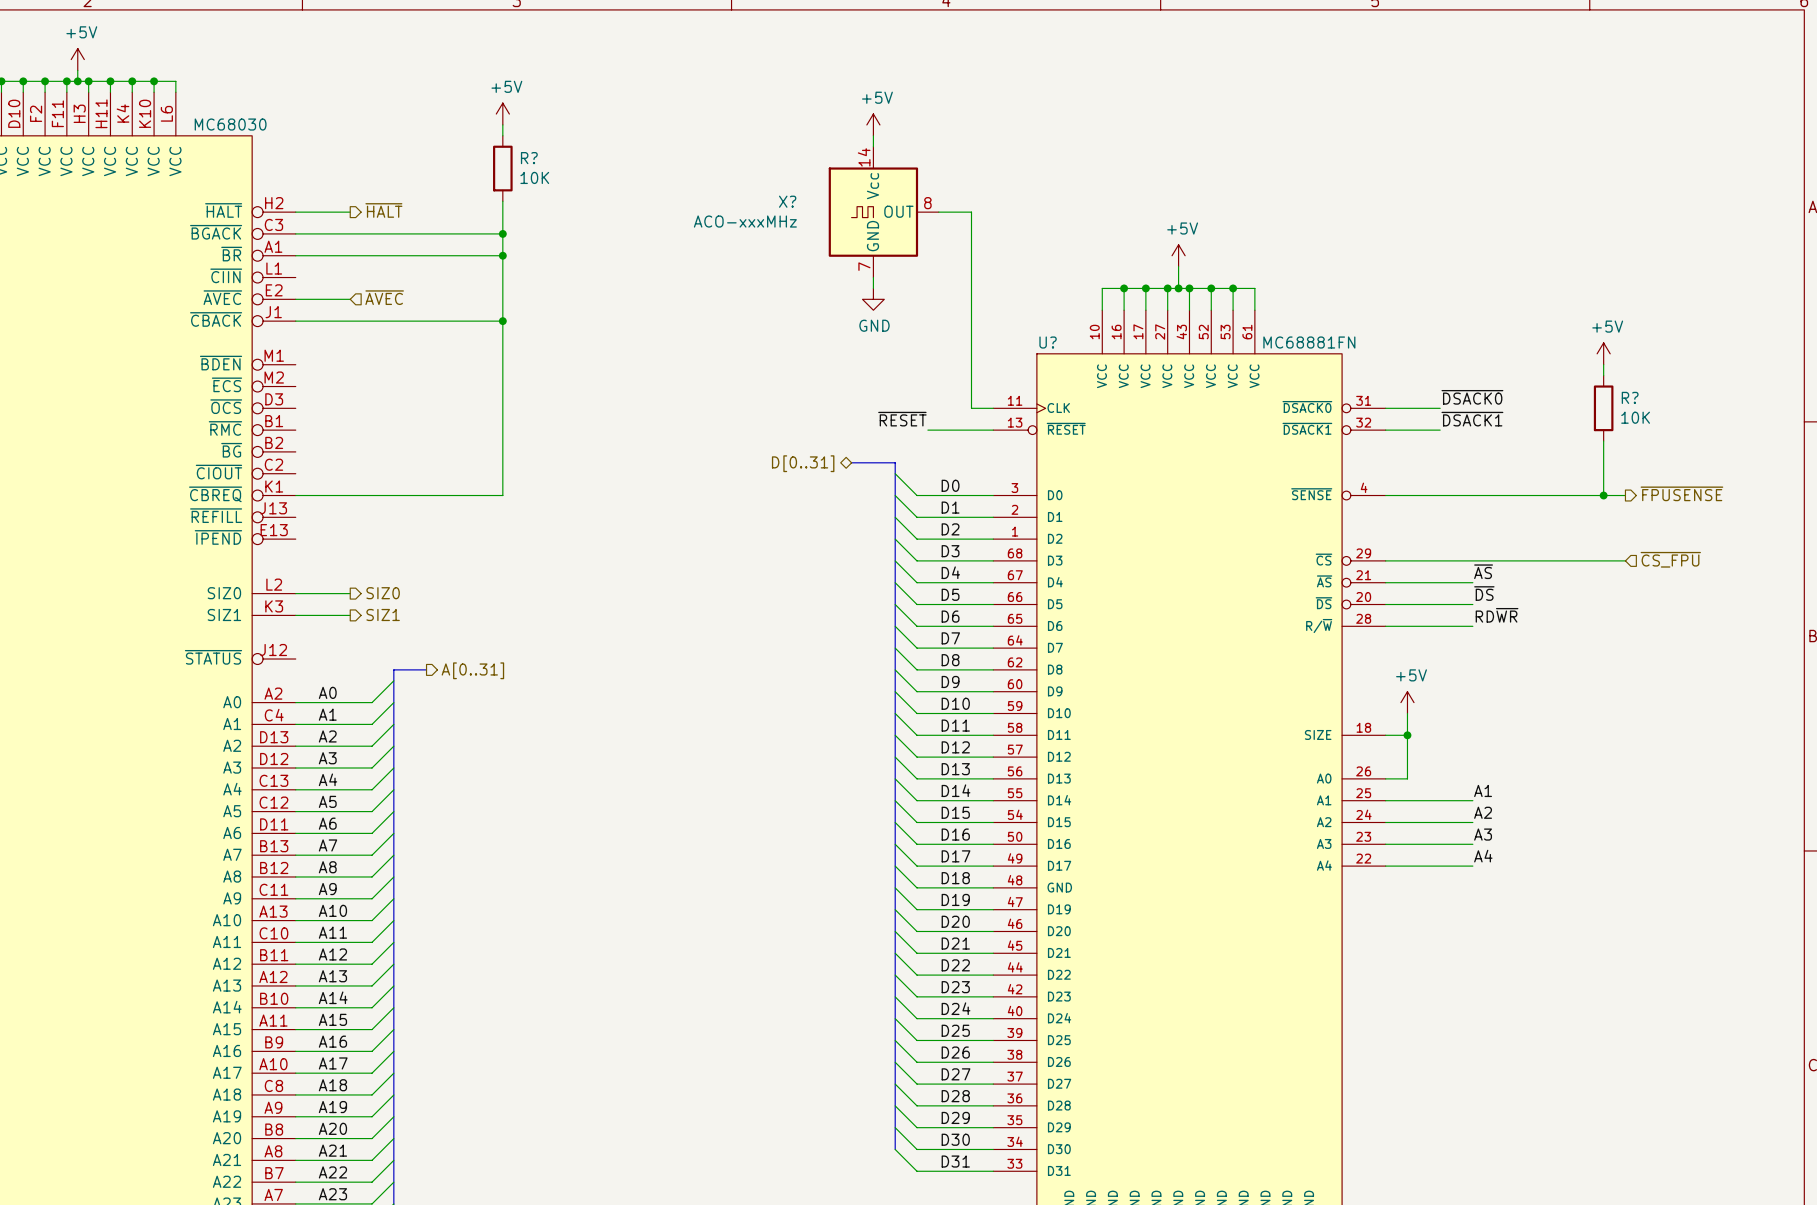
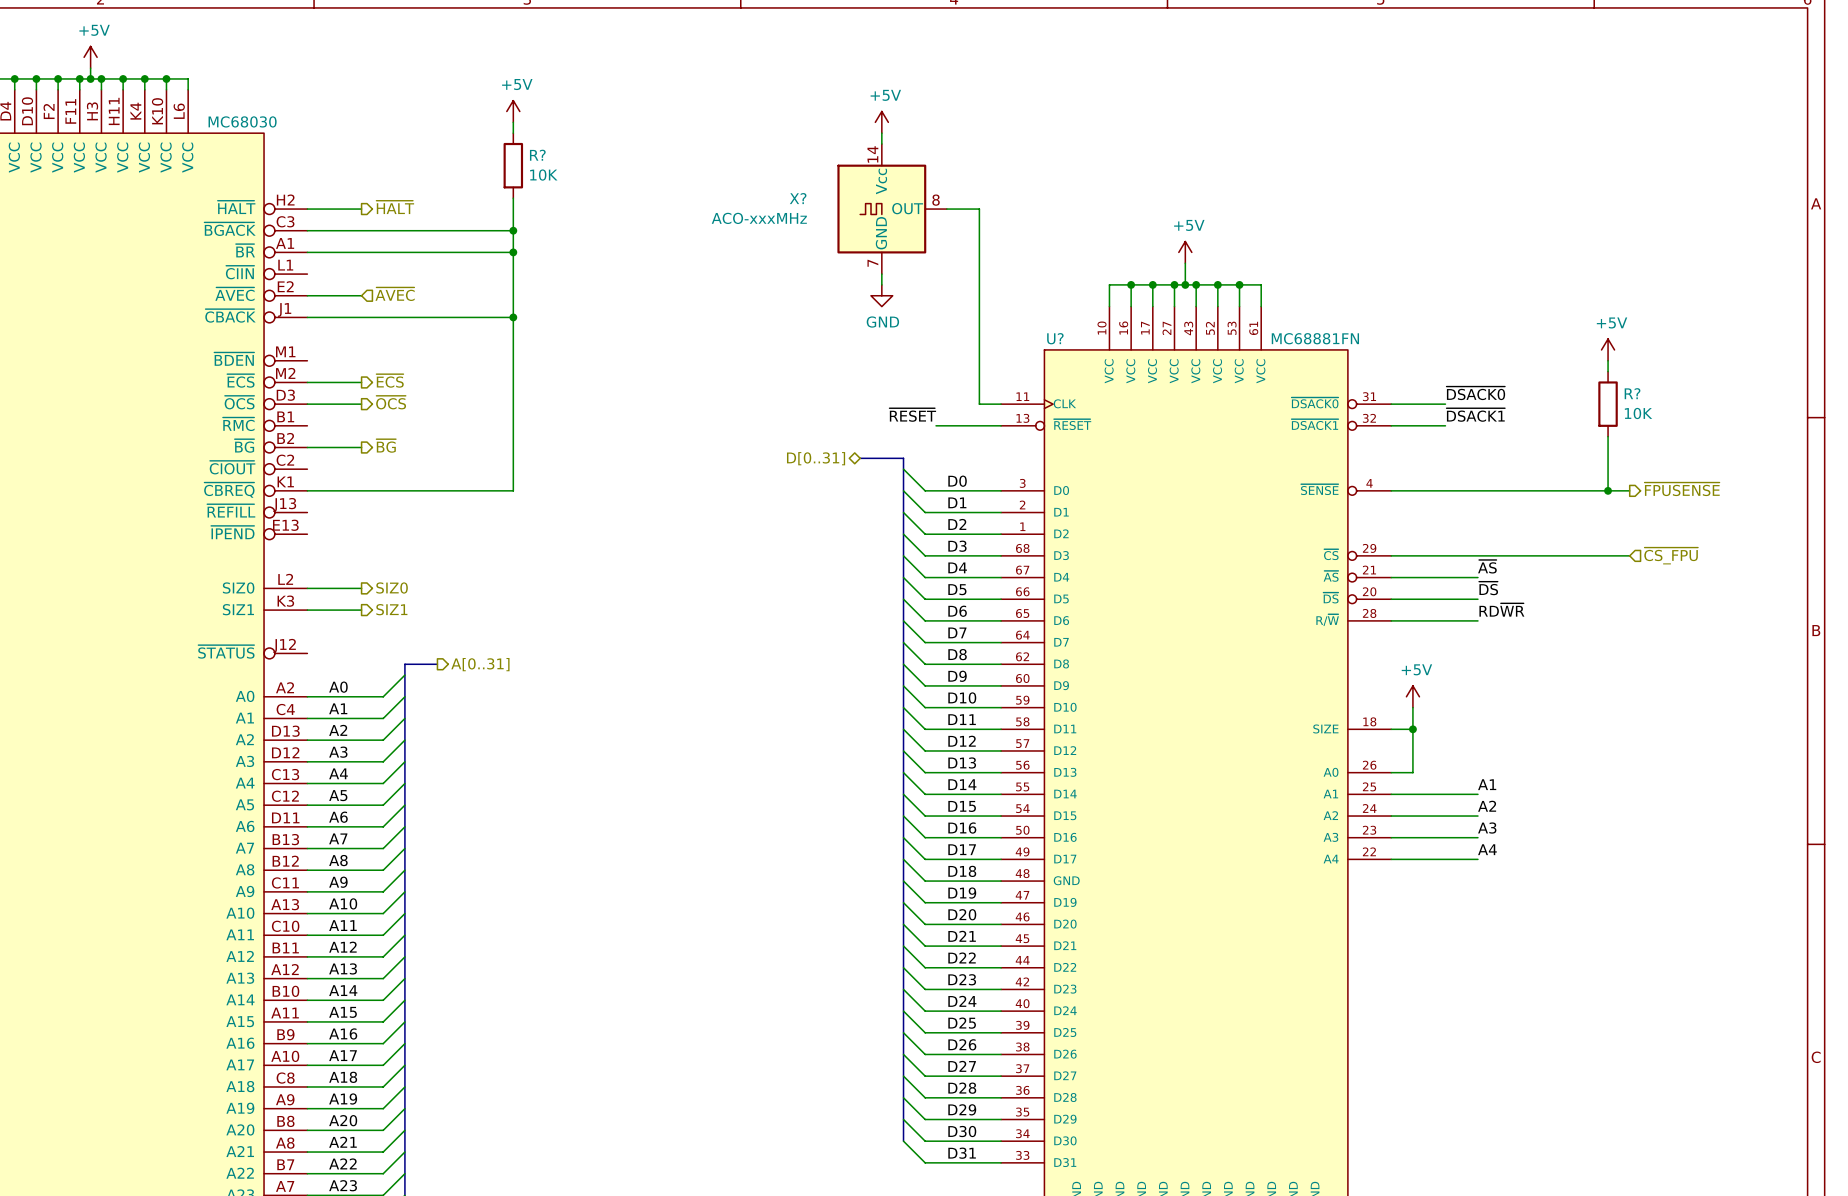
hierarchical label: none -> ~{ECS} (390, 380)
wire: none -> (307, 382) (361, 382)
hierarchical label: none -> ~{OCS} (391, 402)
wire: none -> (307, 404) (361, 404)
hierarchical label: none -> ~{BG} (386, 445)
wire: none -> (307, 447) (361, 447)

